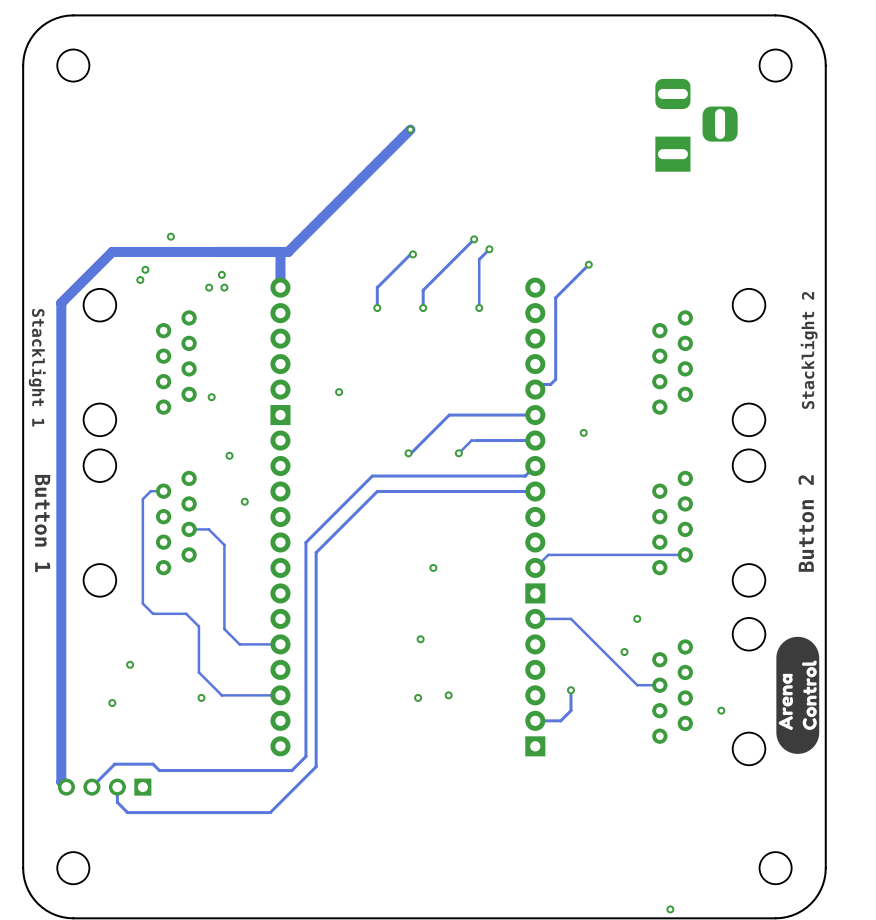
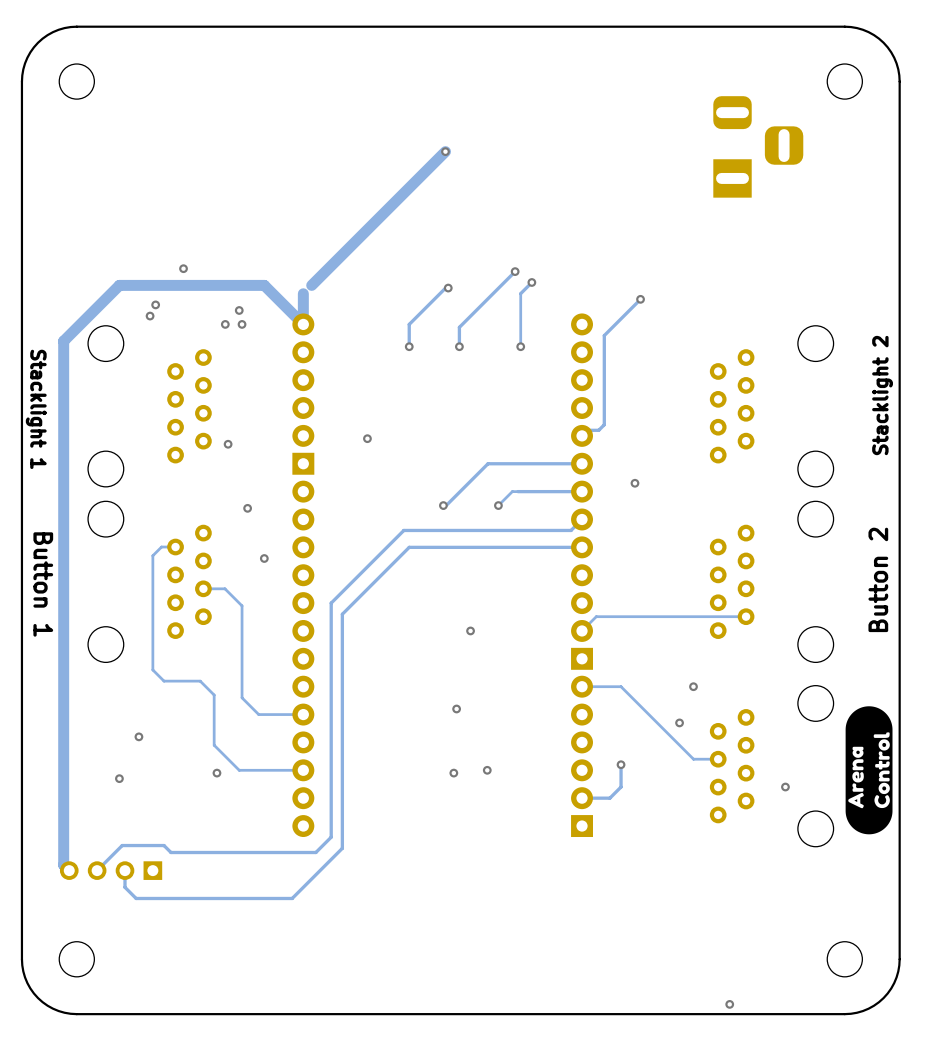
track: (244, 251) (288, 251) (277, 251) (280, 254) (280, 259) -> (264, 285) (303, 324)

